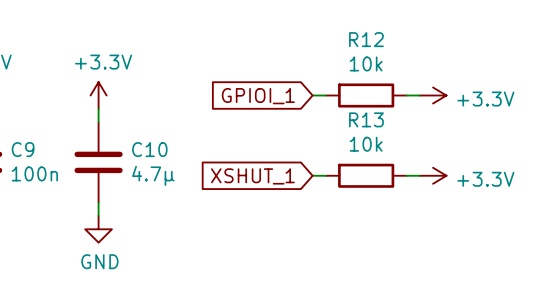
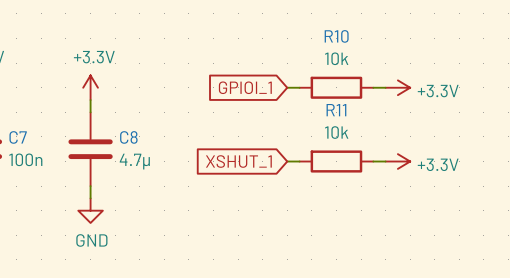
R12 name: R12 (366, 39) -> R10 (336, 36)
R13 name: R13 (366, 119) -> R11 (336, 110)
C9 name: C9 (23, 149) -> C7 (18, 137)
C10 name: C10 (149, 149) -> C8 (128, 137)

